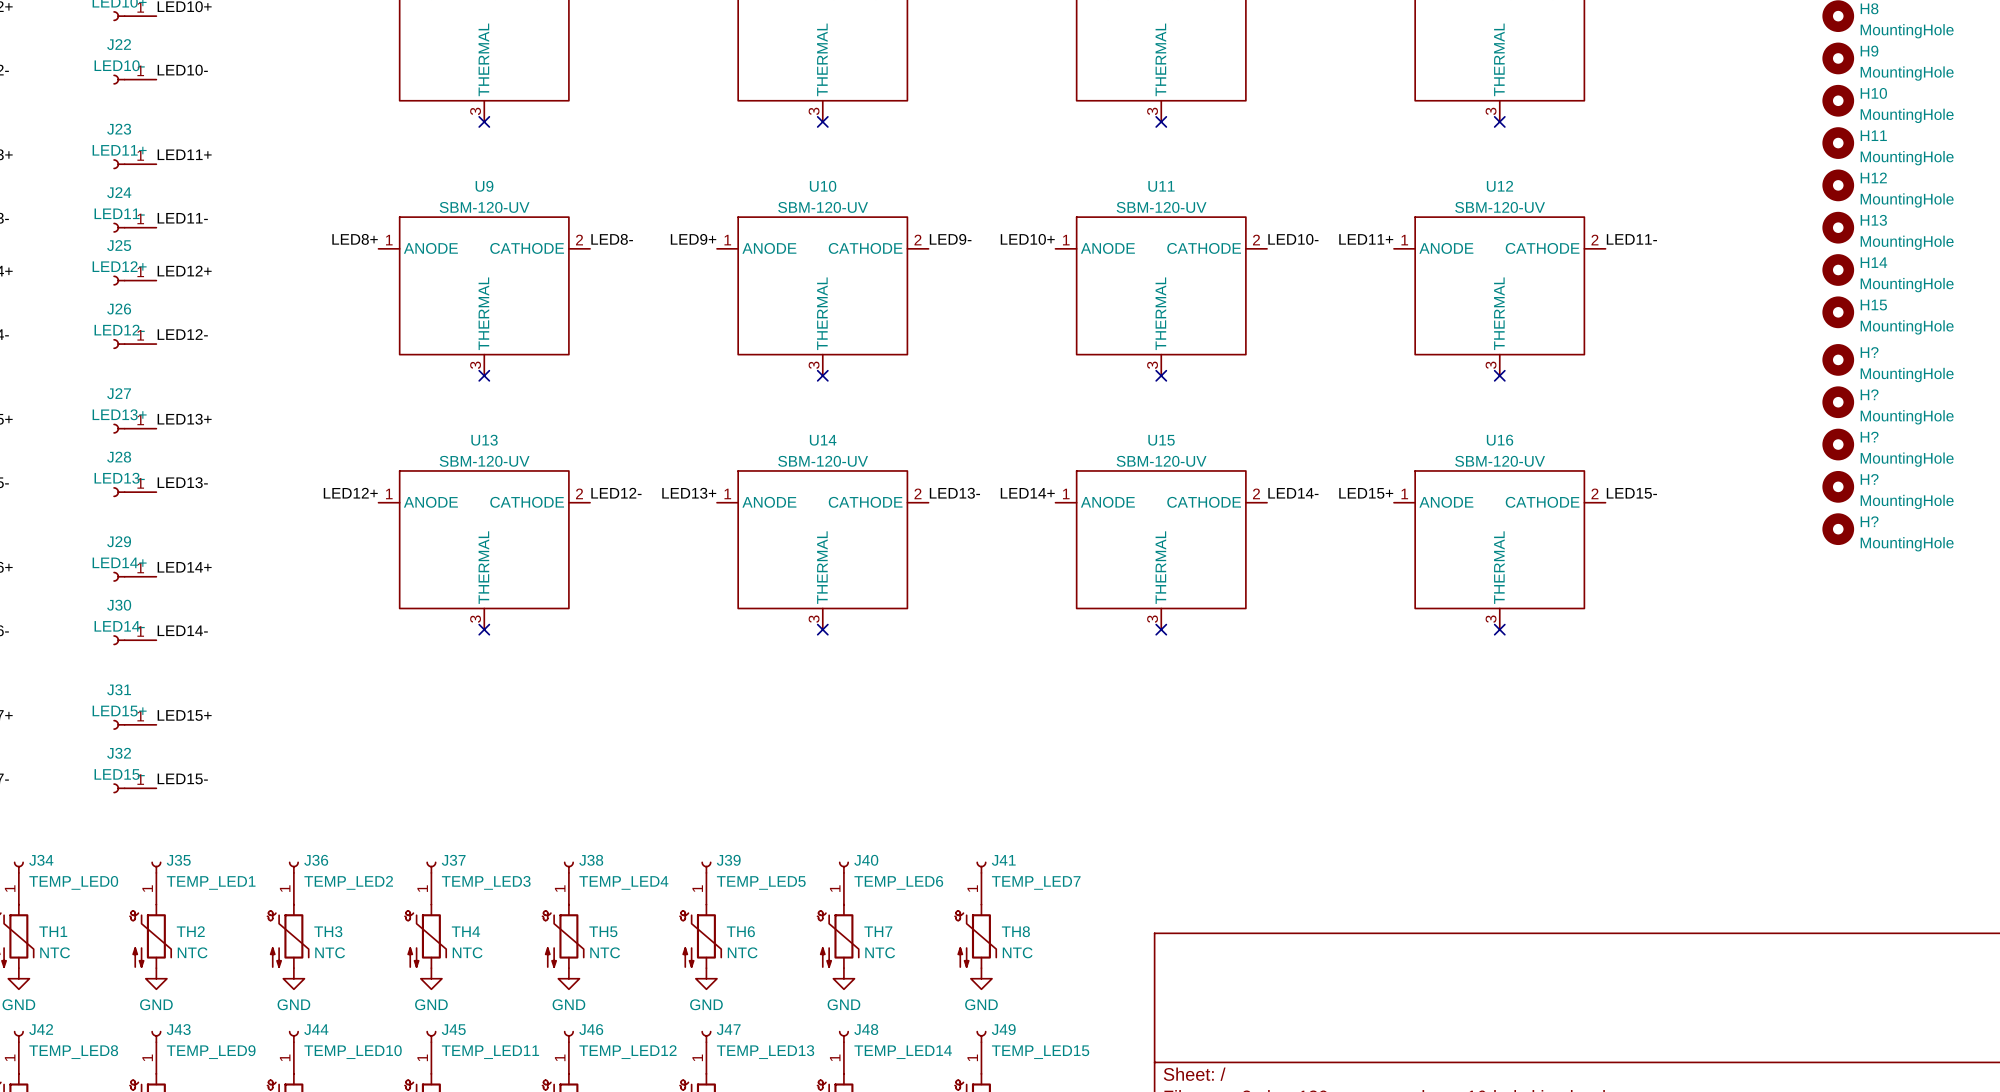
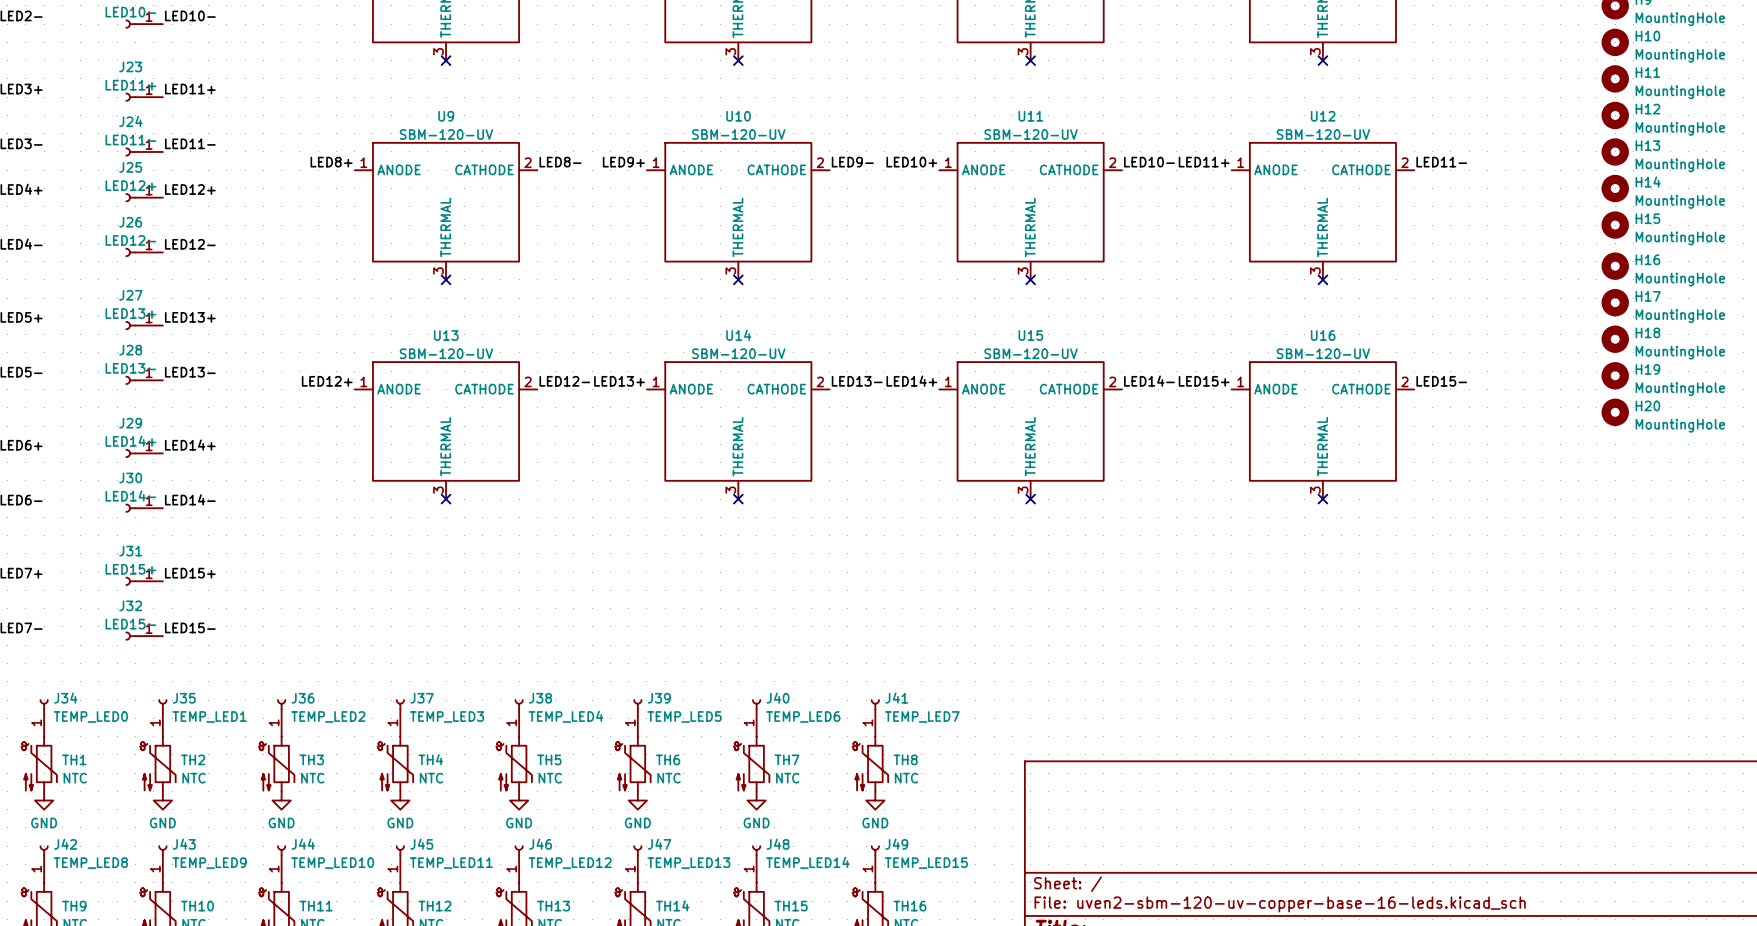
H? name: H? (1869, 352) -> H16 (1647, 259)
H? name: H? (1869, 394) -> H17 (1648, 296)
H? name: H? (1869, 437) -> H18 (1647, 332)
H? name: H? (1869, 479) -> H19 (1647, 369)
H? name: H? (1869, 521) -> H20 (1647, 405)

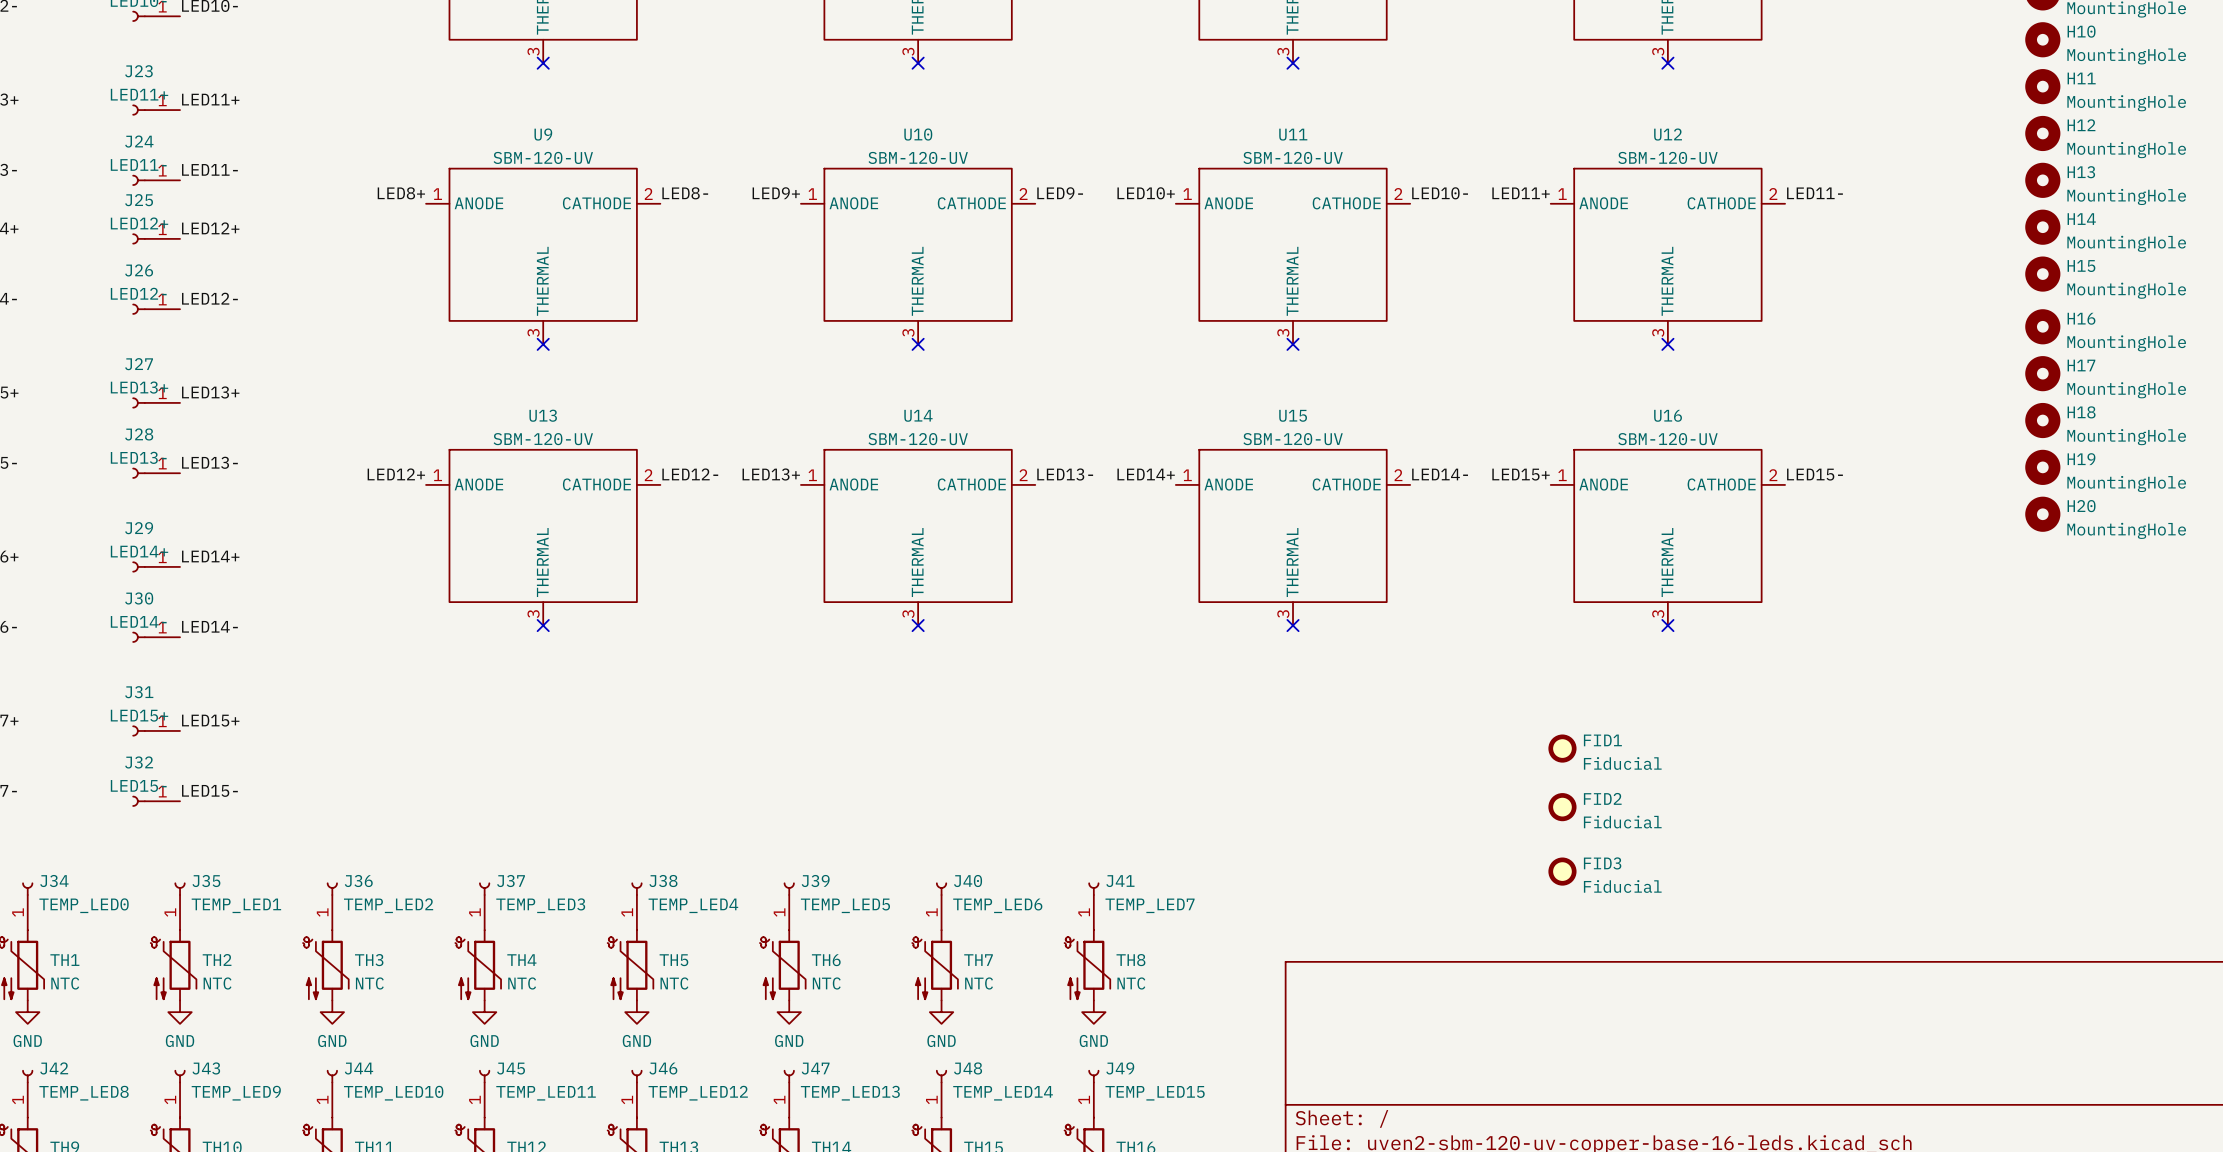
FID1: none -> Fiducial (1562, 748)
FID2: none -> Fiducial (1562, 807)
FID3: none -> Fiducial (1562, 871)

